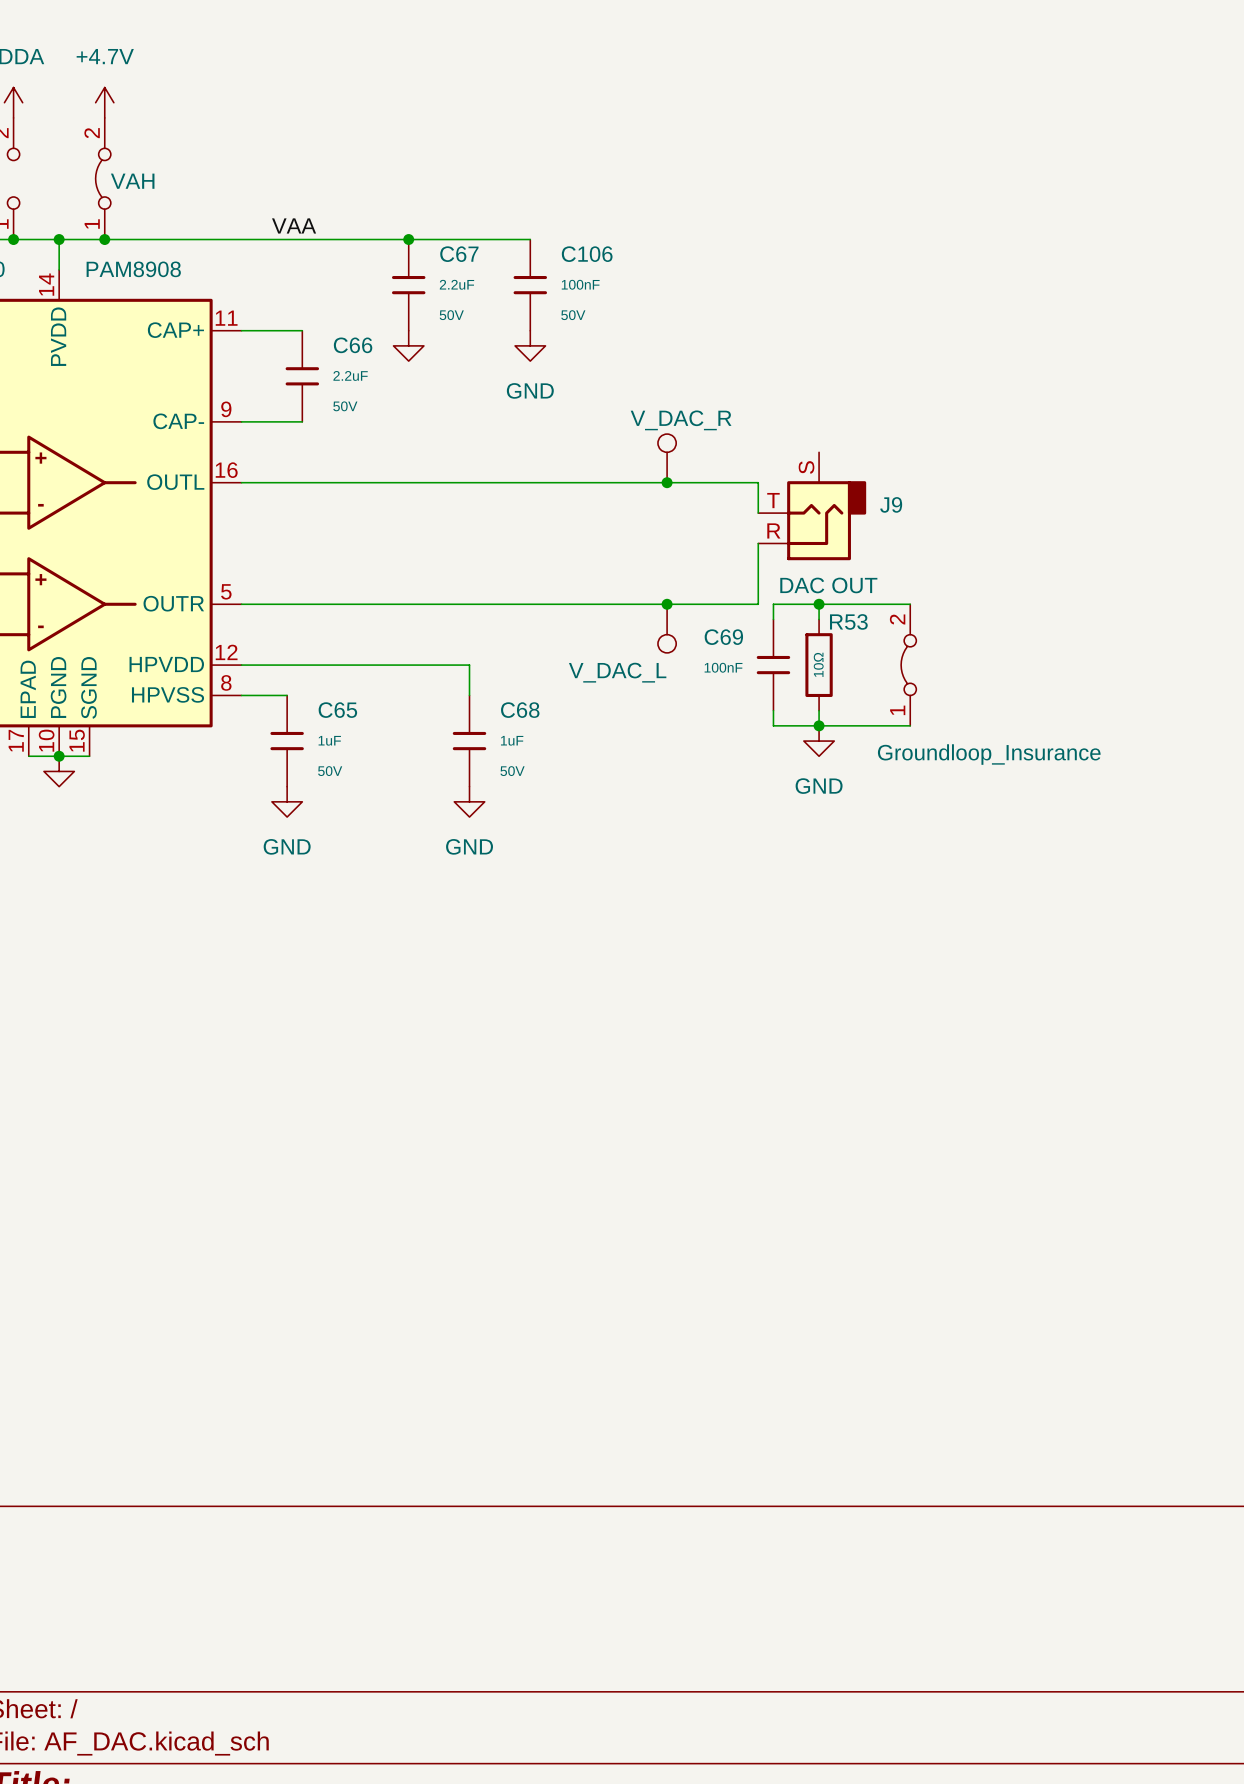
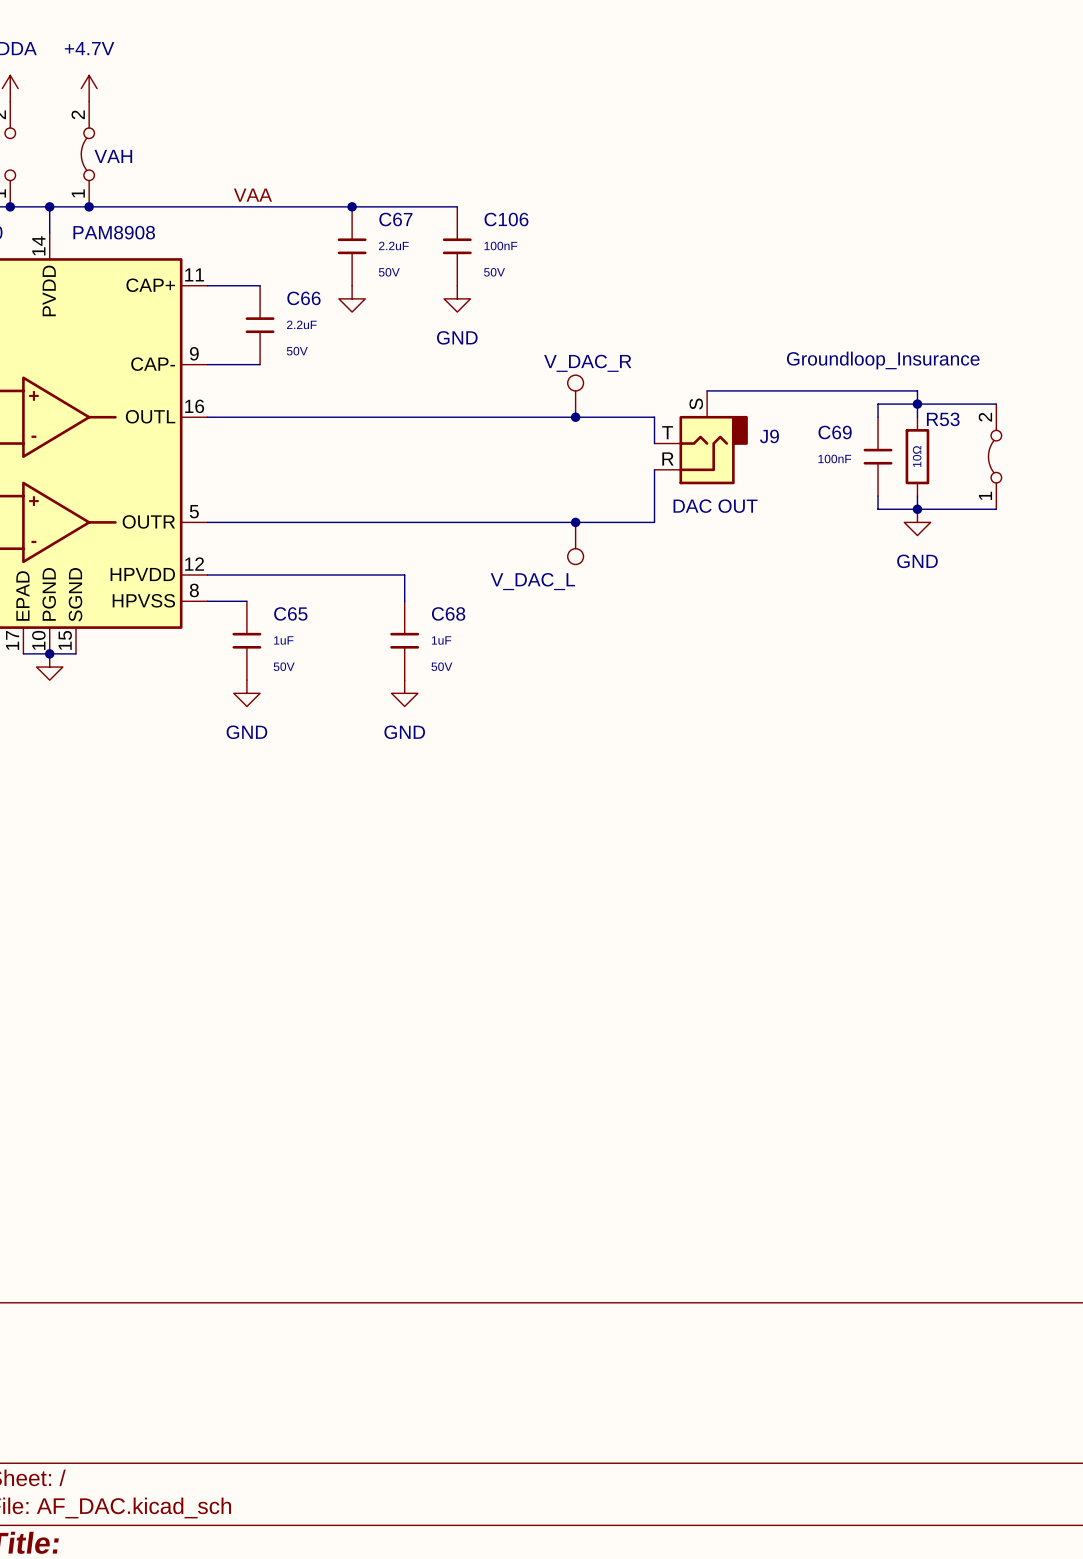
wire: none -> (707, 390) (917, 390) (917, 417)
junction: none -> (917, 404)
junction: none -> (917, 509)
wire: (819, 604) (819, 619) -> none
junction: (819, 604) -> none
wire: (910, 604) (773, 604) (773, 619) -> (996, 404) (878, 404) (878, 417)
C69 position: (773, 665) -> (878, 456)
R53 position: (819, 665) -> (917, 456)
part position: (908, 665) -> (995, 456)
wire: (773, 710) (773, 725) (910, 725) -> (878, 496) (878, 509) (996, 509)
wire: (819, 710) (819, 725) -> (917, 496) (917, 509)
junction: (819, 725) -> none
power symbol position: GND (819, 741) -> GND (917, 522)
part value position: Groundloop_Insurance (989, 754) -> Groundloop_Insurance (883, 360)

